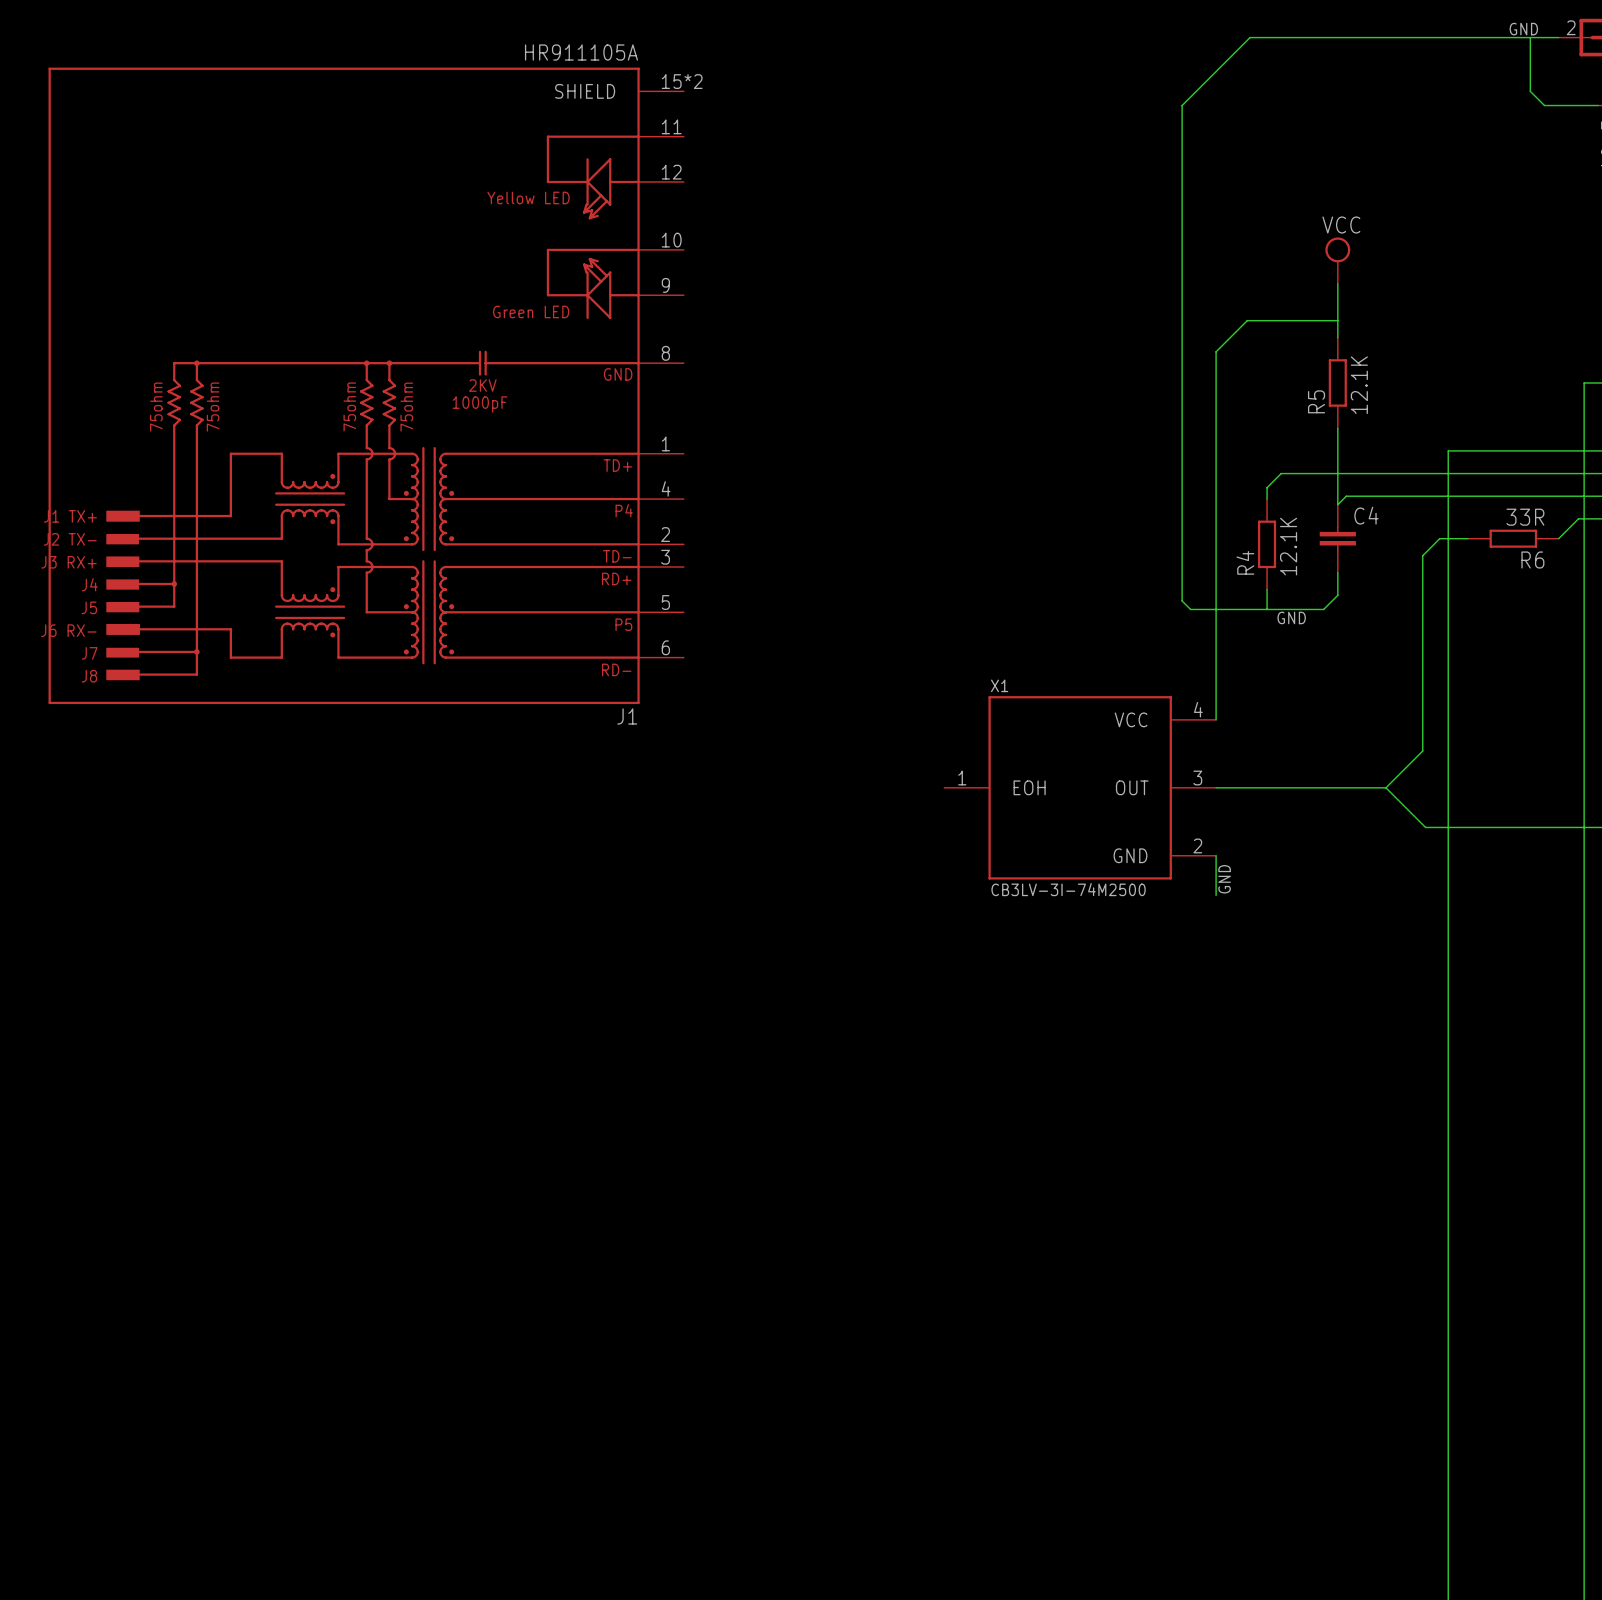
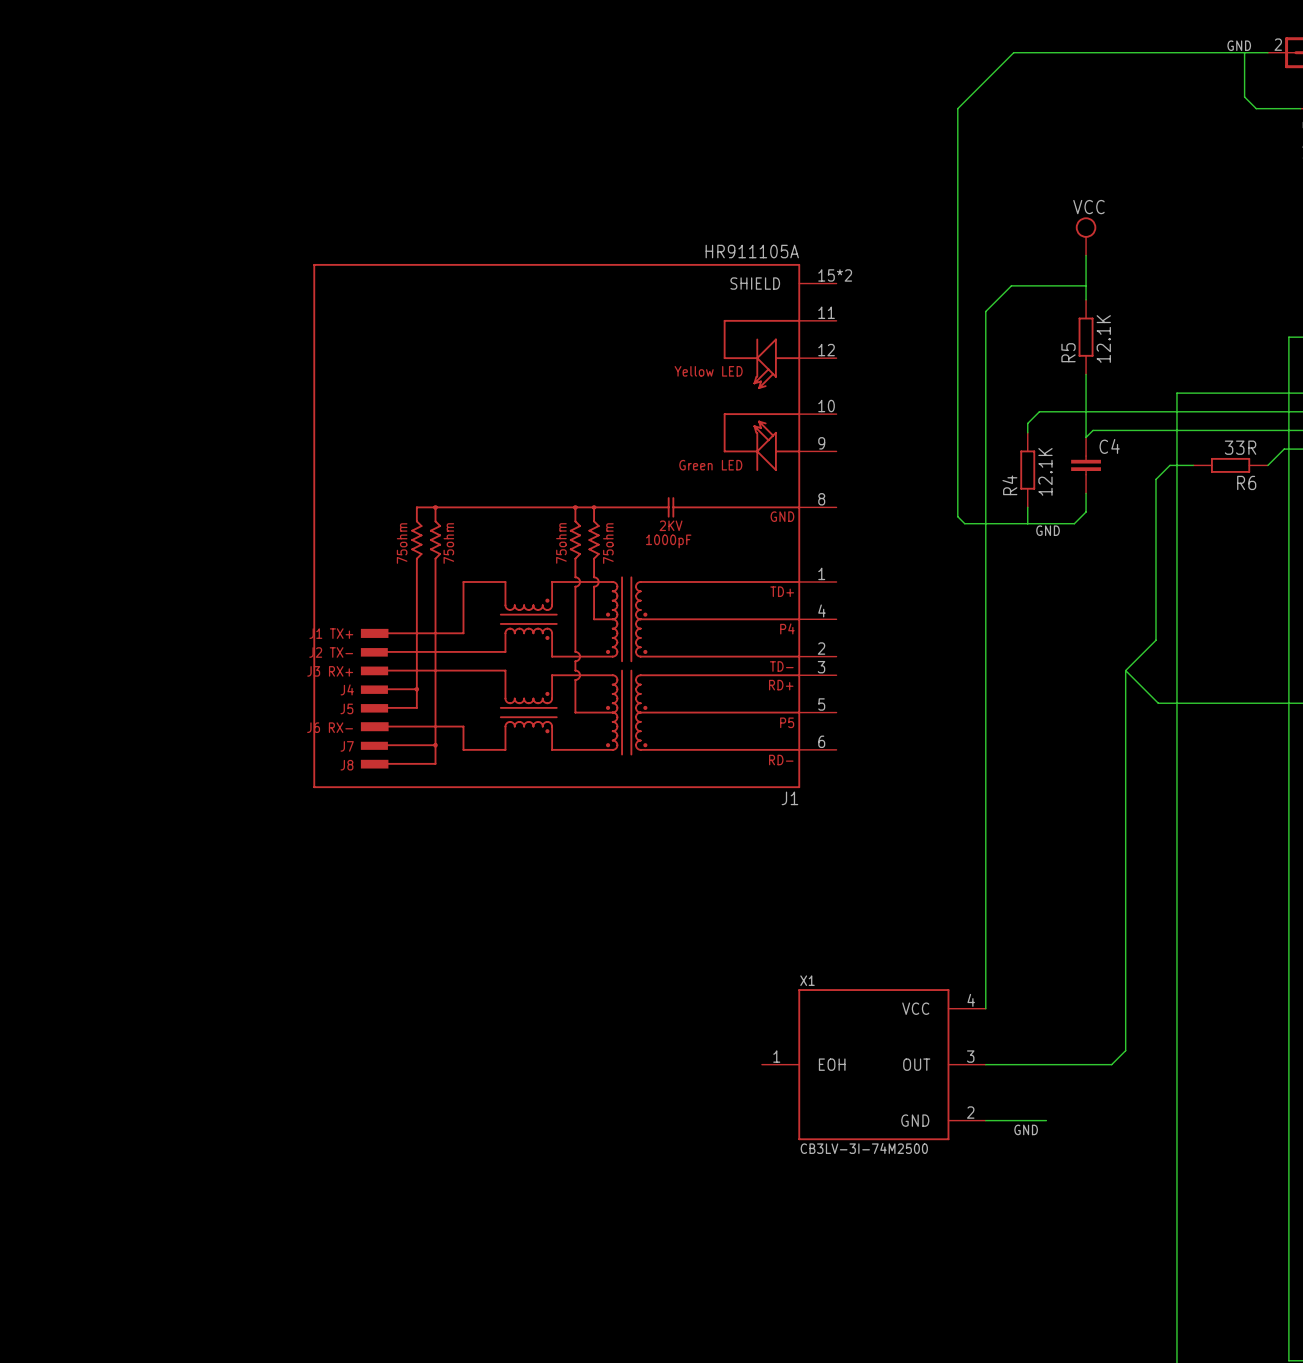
J1 position: (366, 385) -> (574, 526)
X1 symbol: [944, 696, 1217, 880] -> [761, 989, 986, 1141]
wire: none -> (985, 614) (985, 726)
wire: (1216, 787) (1385, 787) -> (985, 1064) (1111, 1064) (1125, 1050) (1125, 670)
label: GND (1224, 879) -> none
wire: none -> (985, 759) (985, 1008)
wire: none -> (985, 1120) (1046, 1120)
label: none -> GND (1026, 1129)

